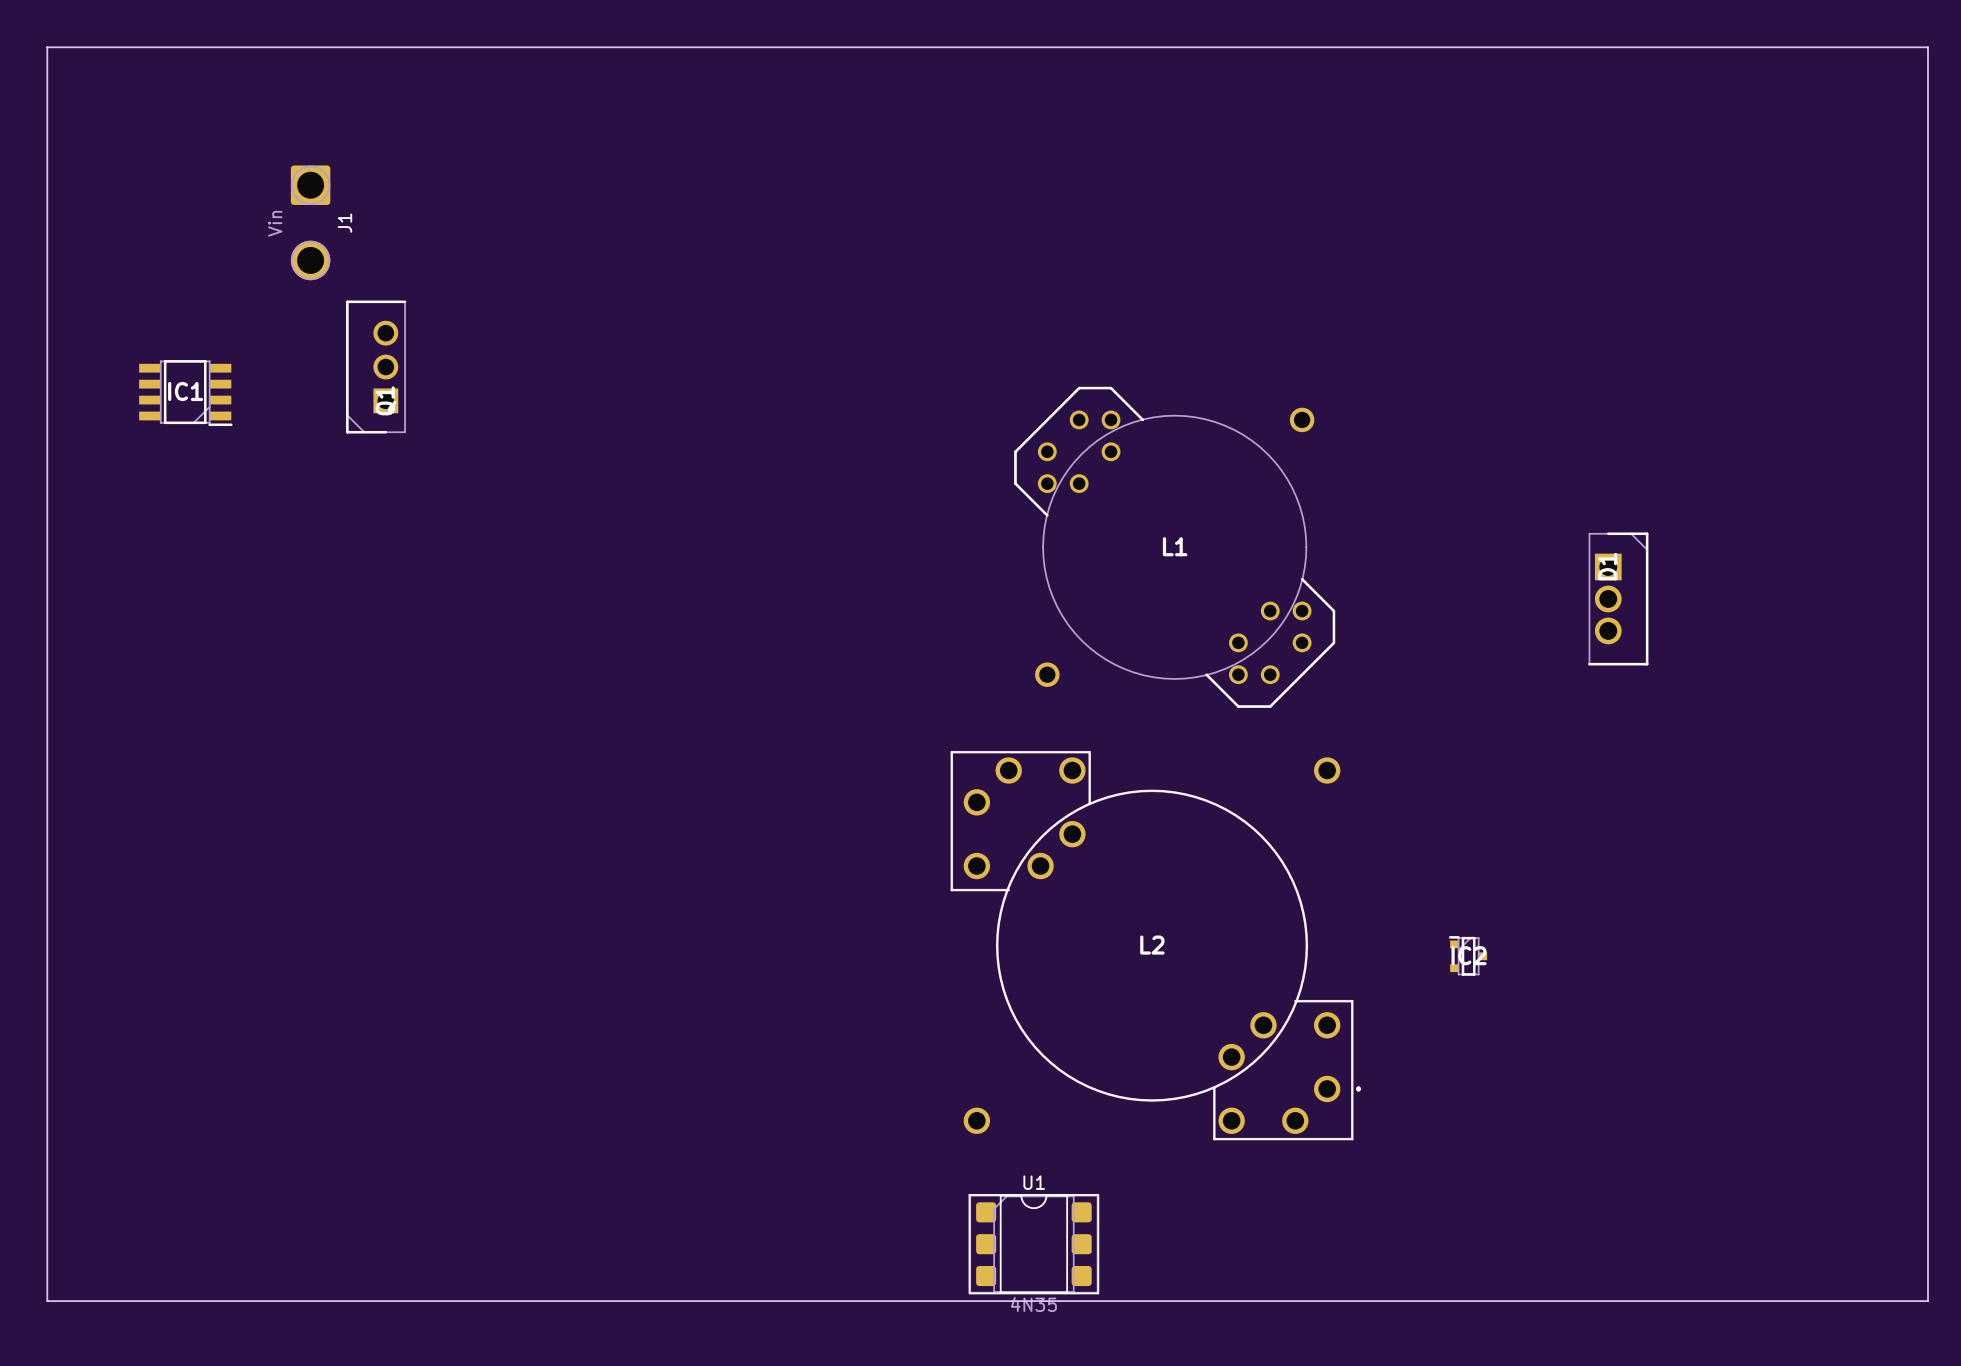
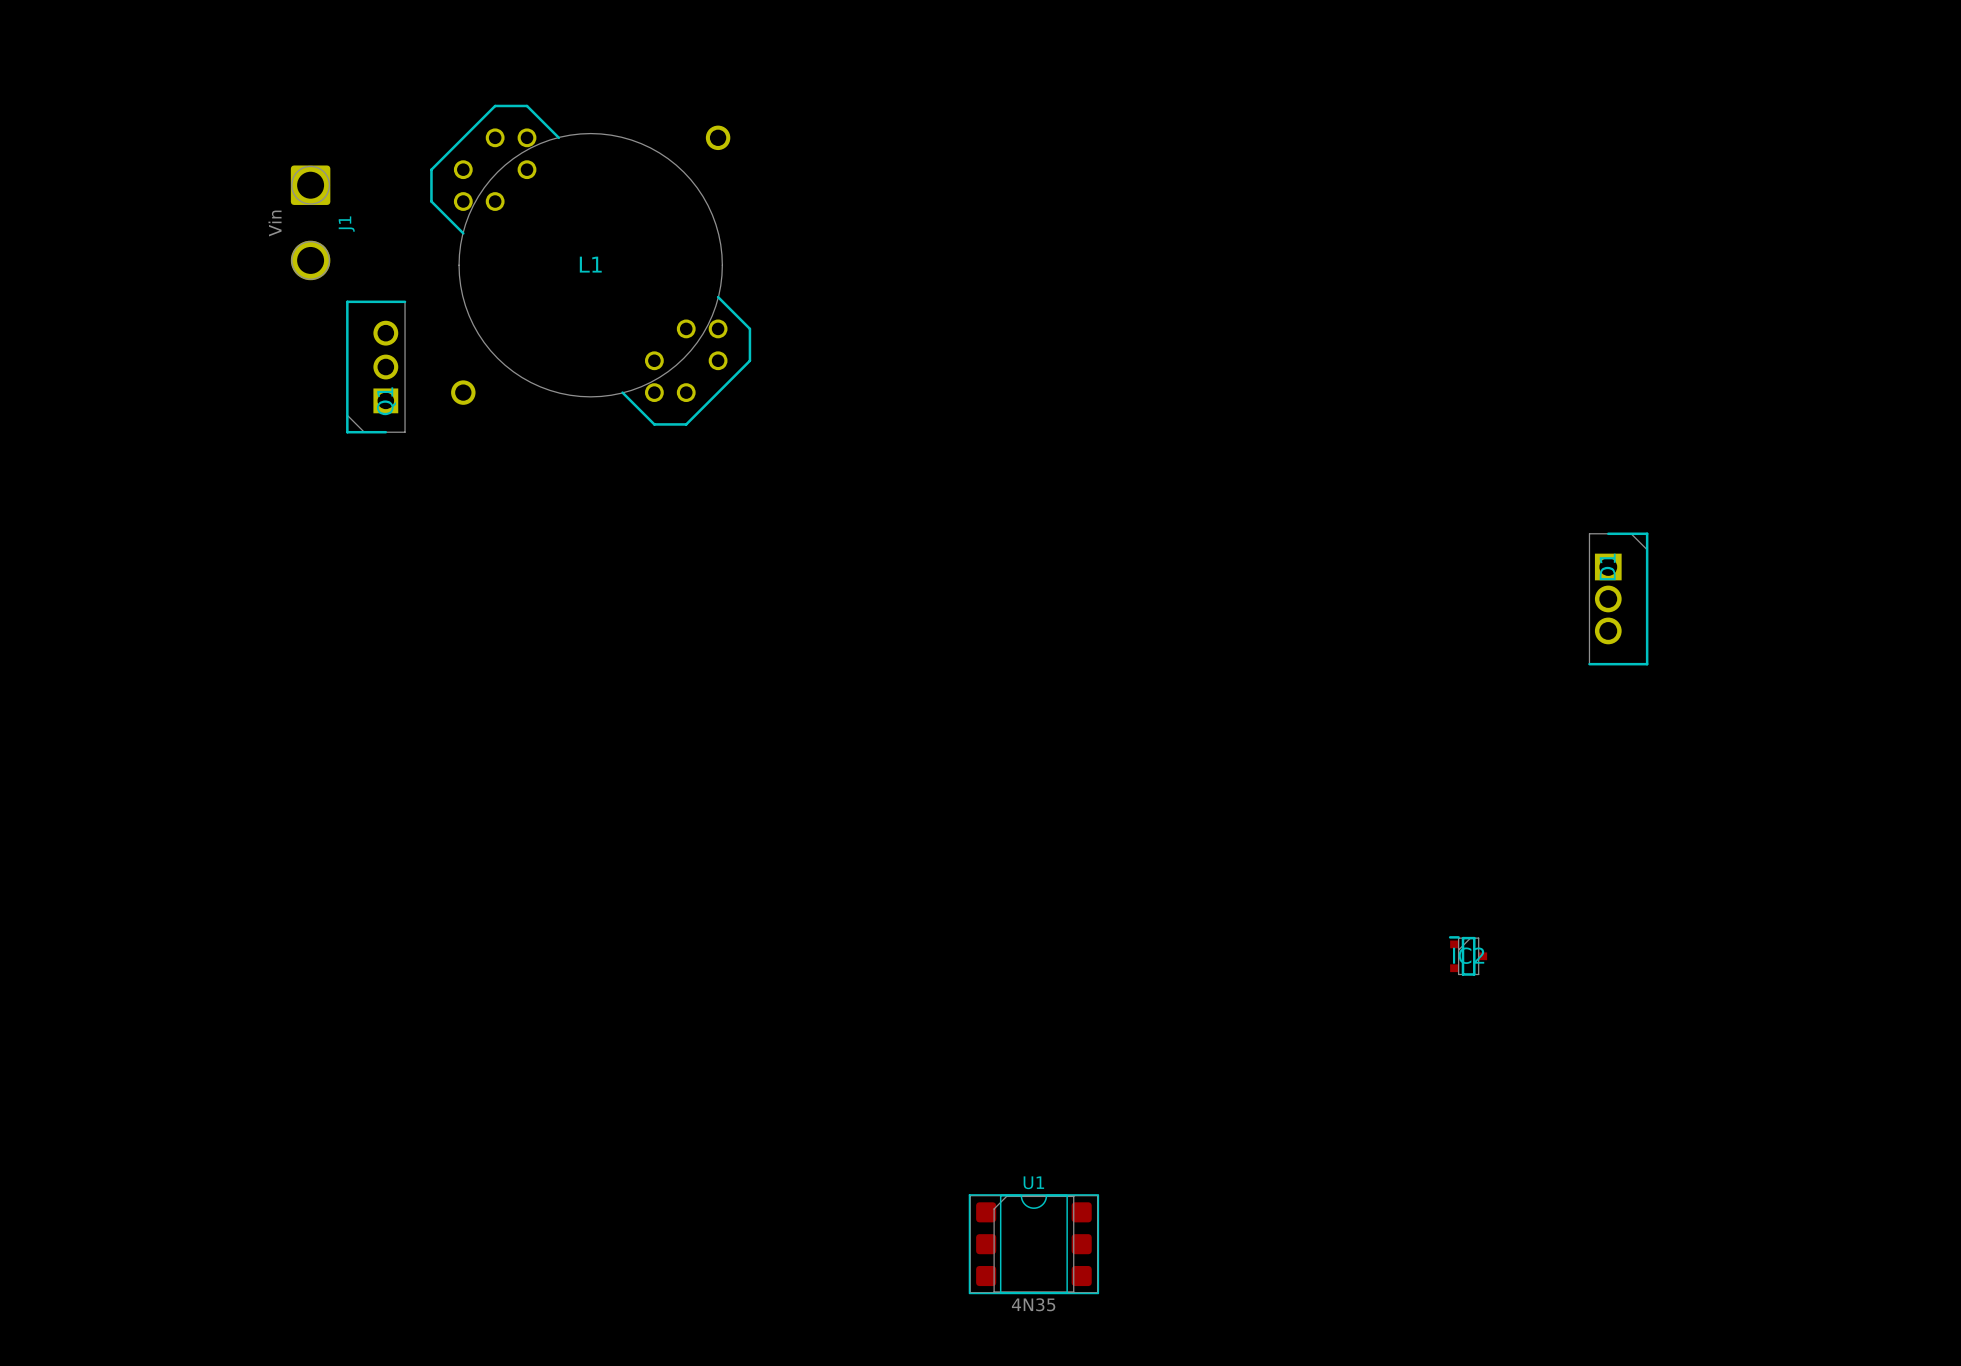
board edge: (47, 47) (1928, 47) (1928, 1301) (47, 1301) (47, 47) -> none
IC1: (185, 393) -> none
L1 position: (1174, 547) -> (590, 265)
L2: (1155, 945) -> none

